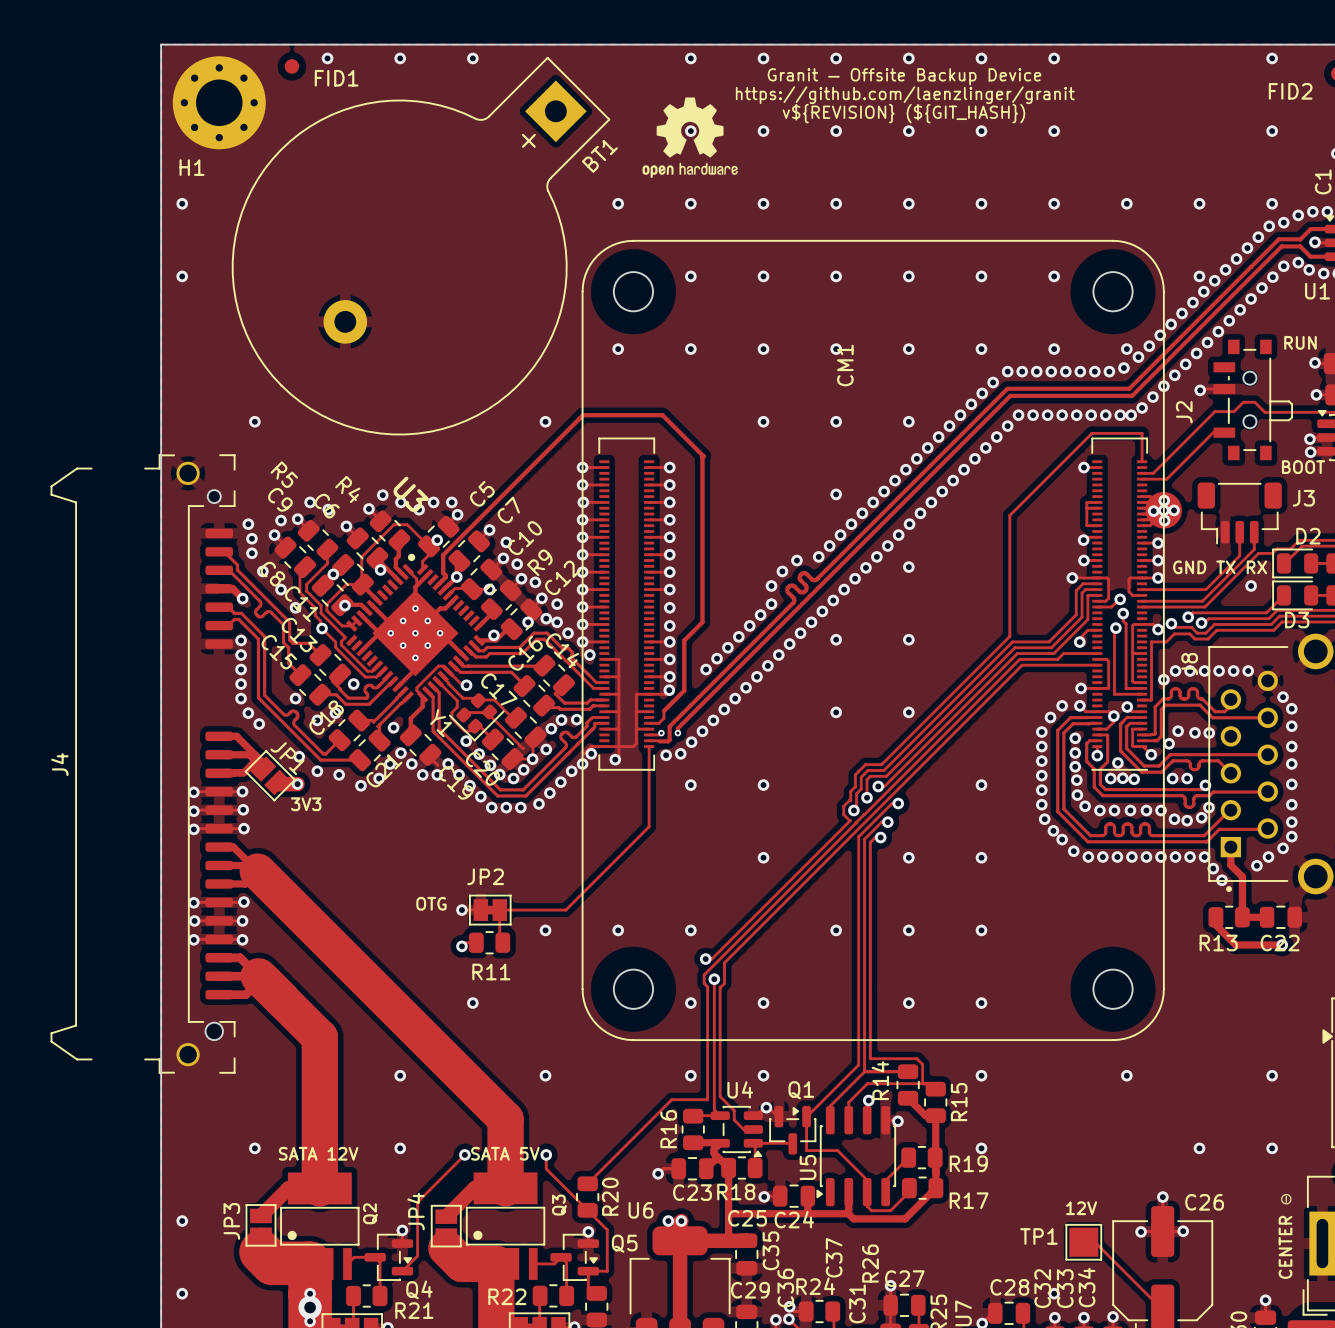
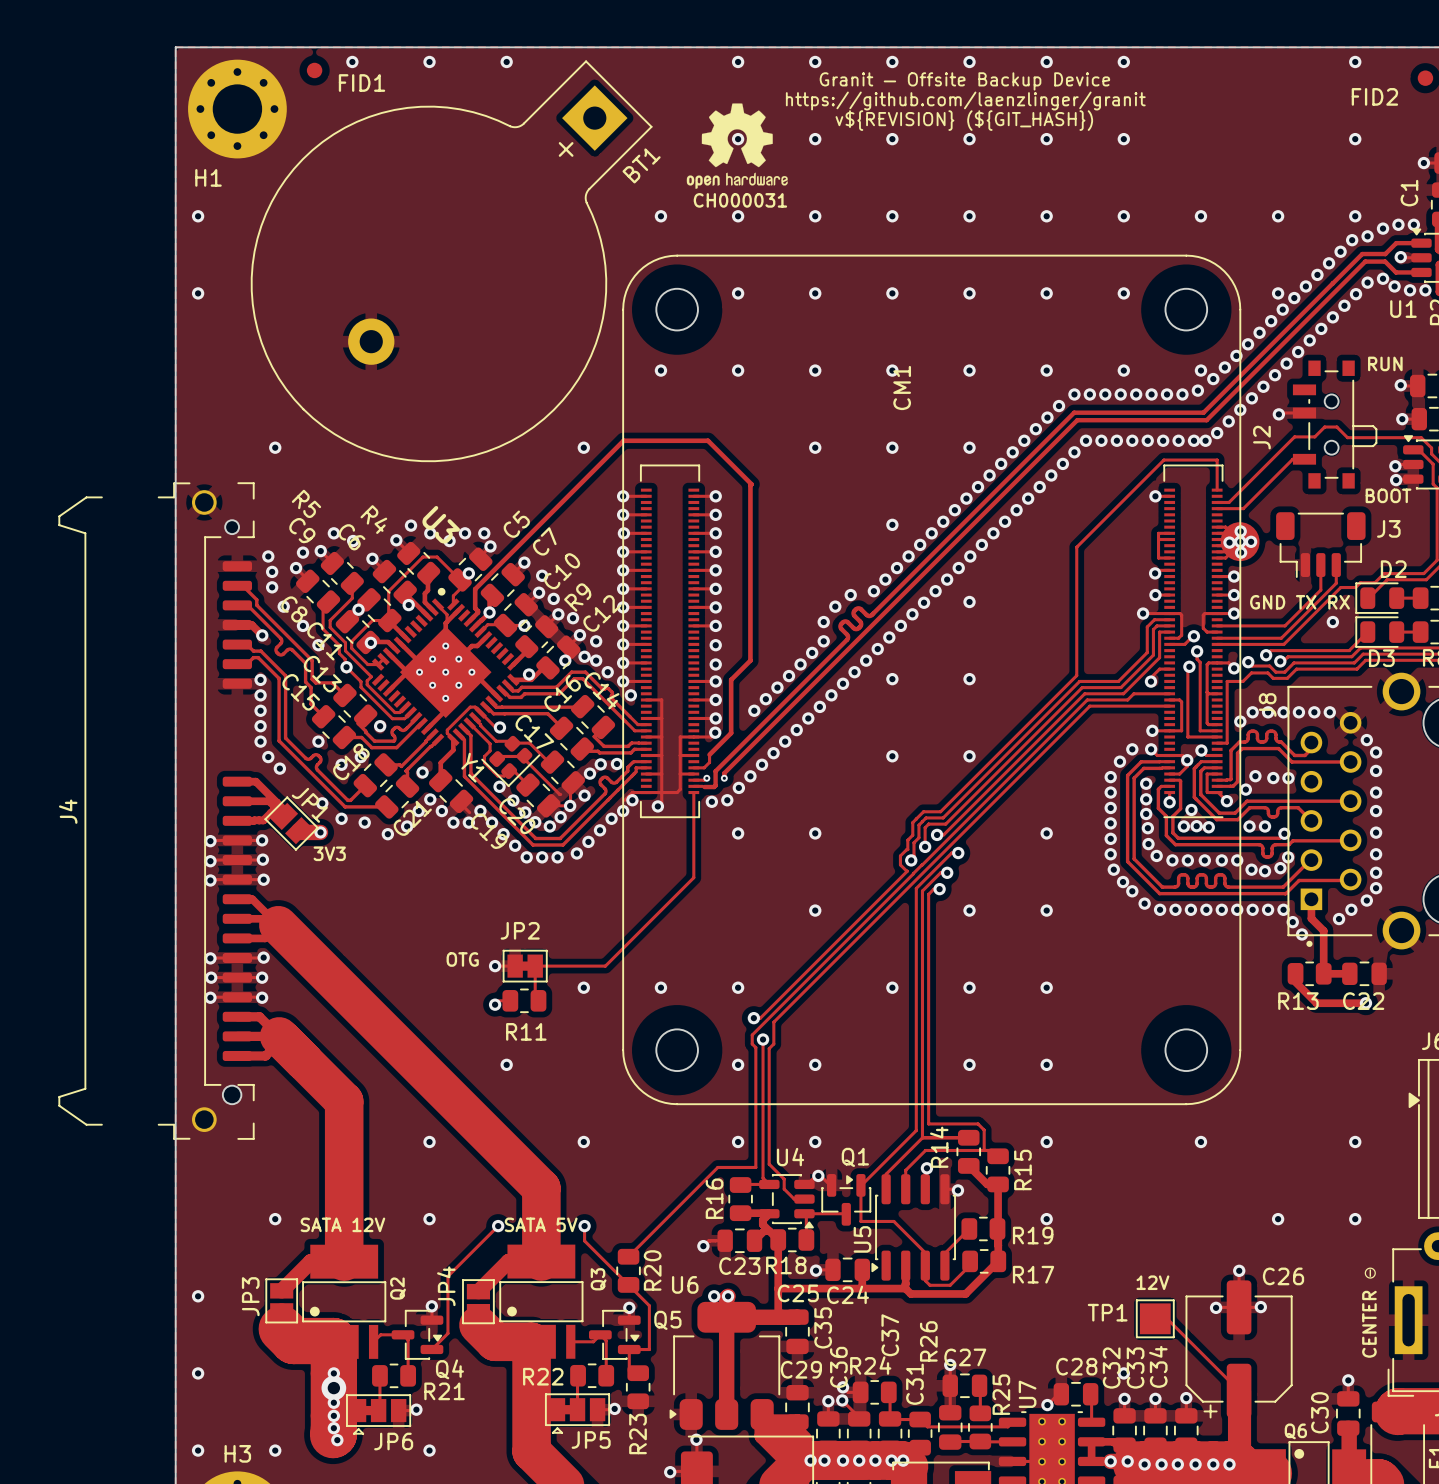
text: none -> CH000031 (740, 200)

